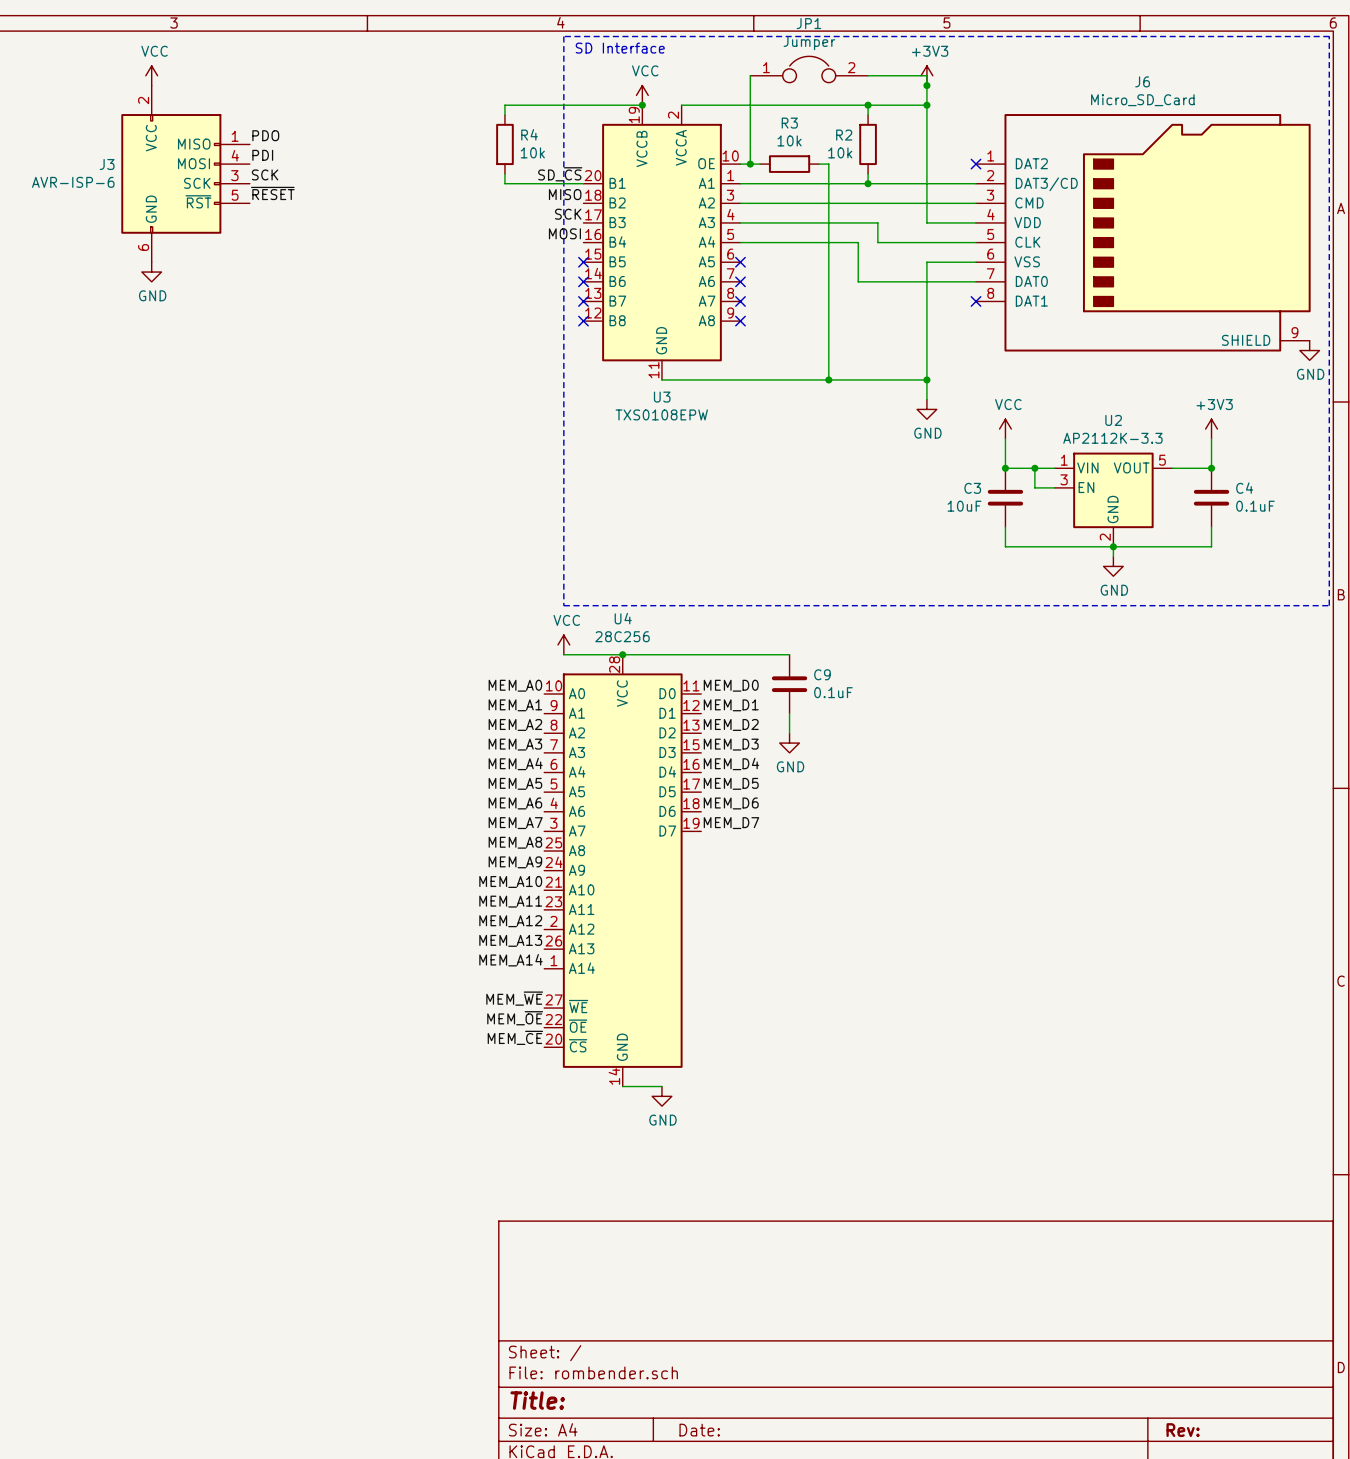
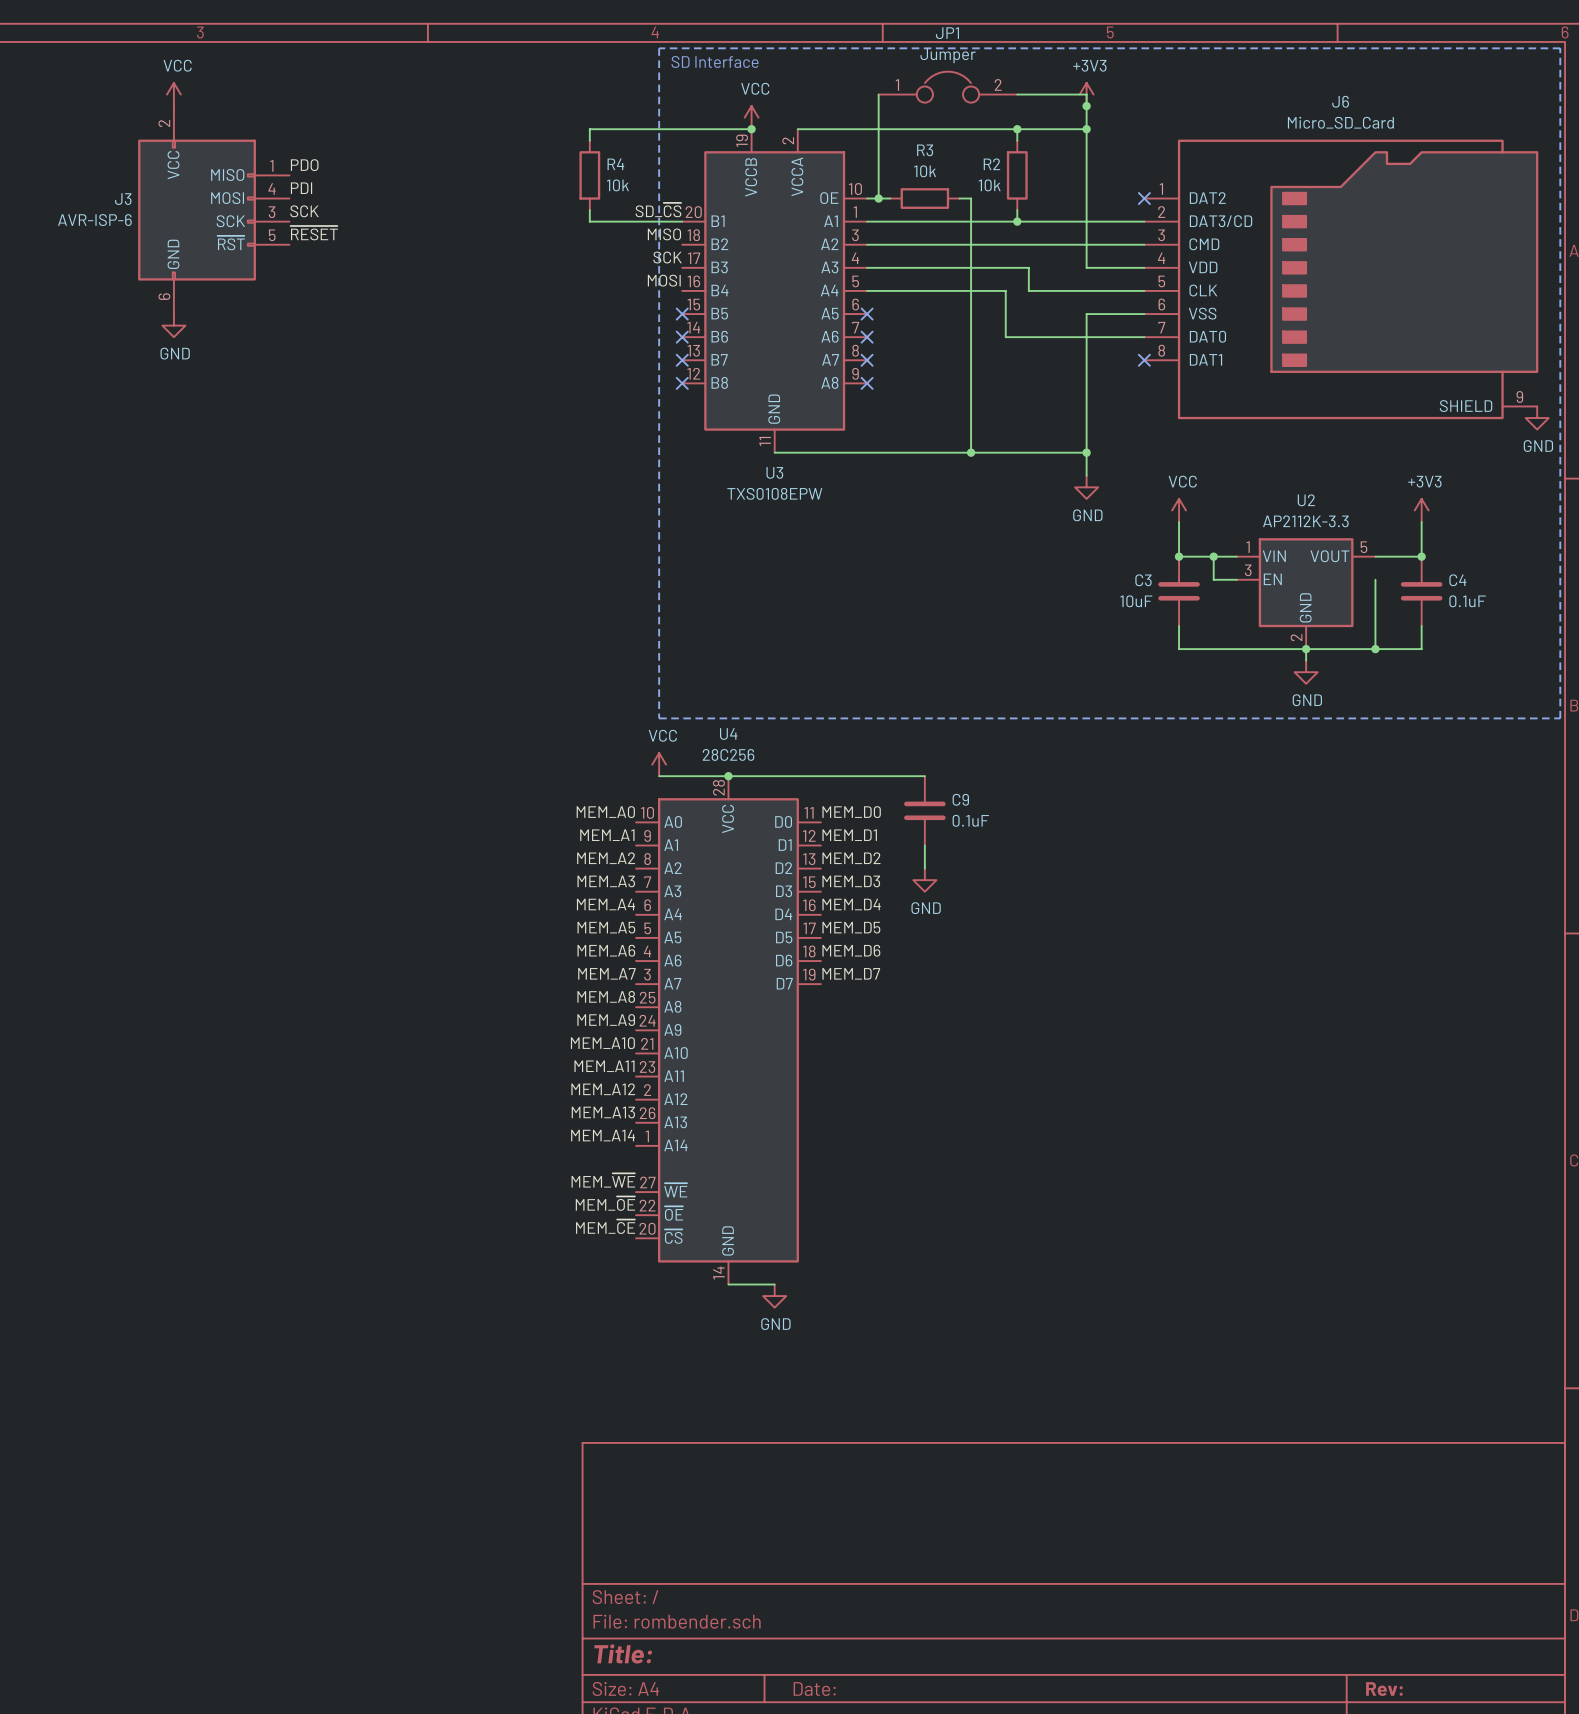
wire: none -> (1375, 579) (1375, 649)
junction: none -> (1375, 649)

